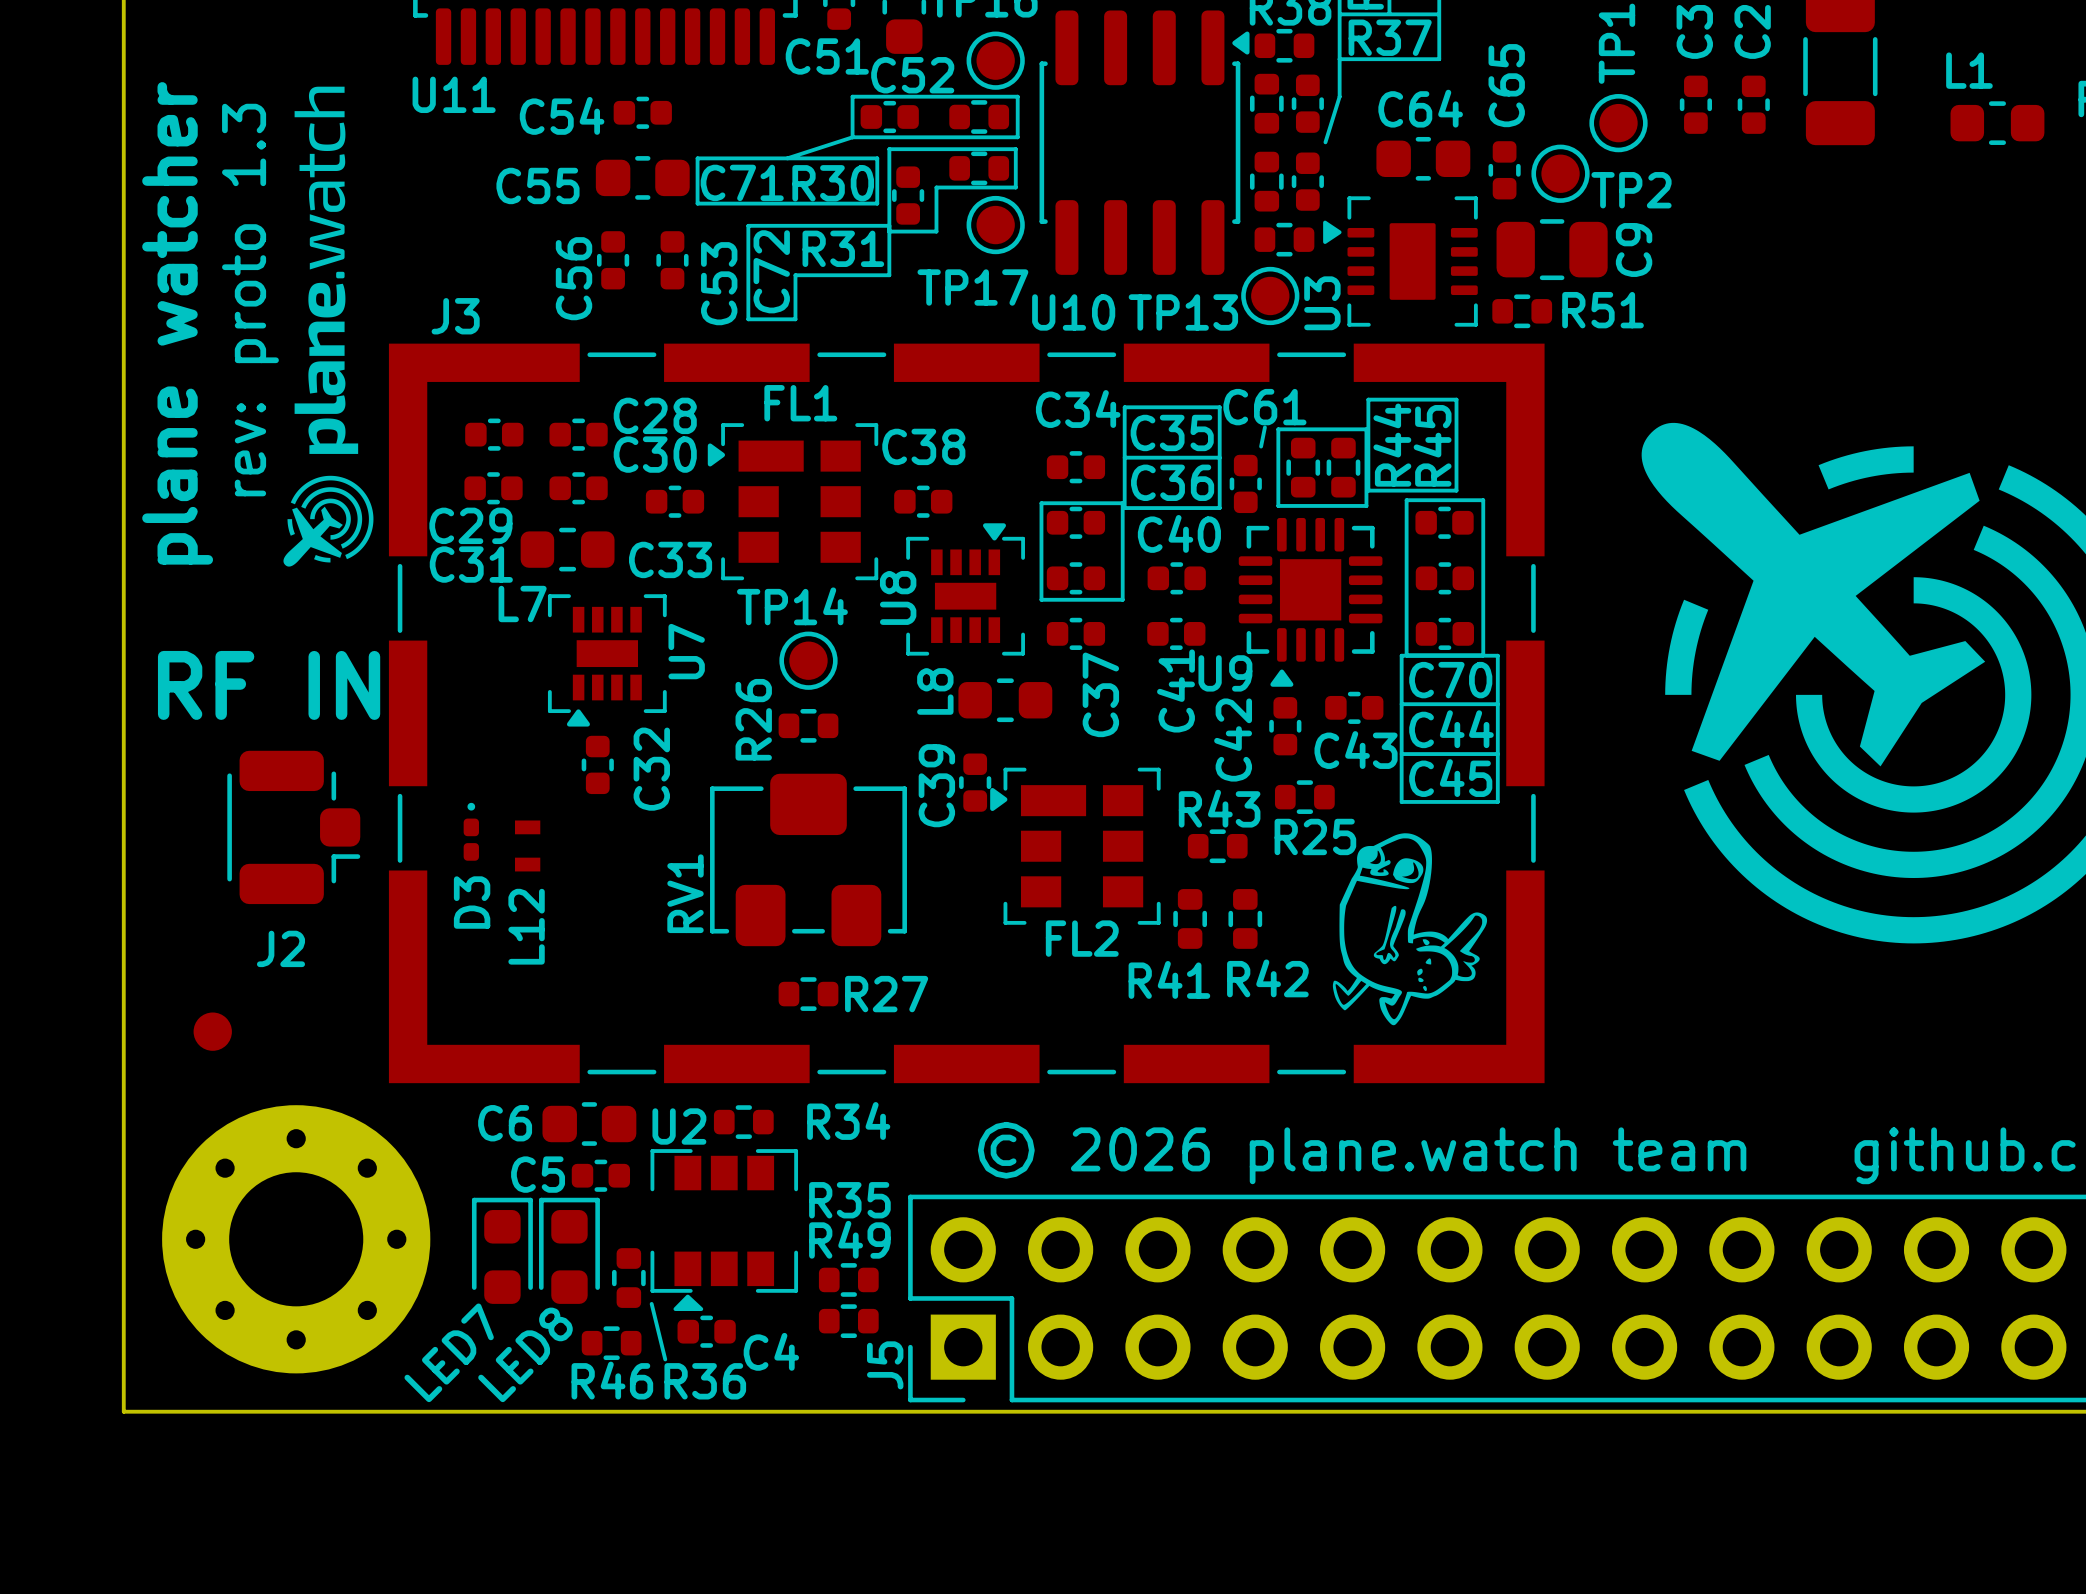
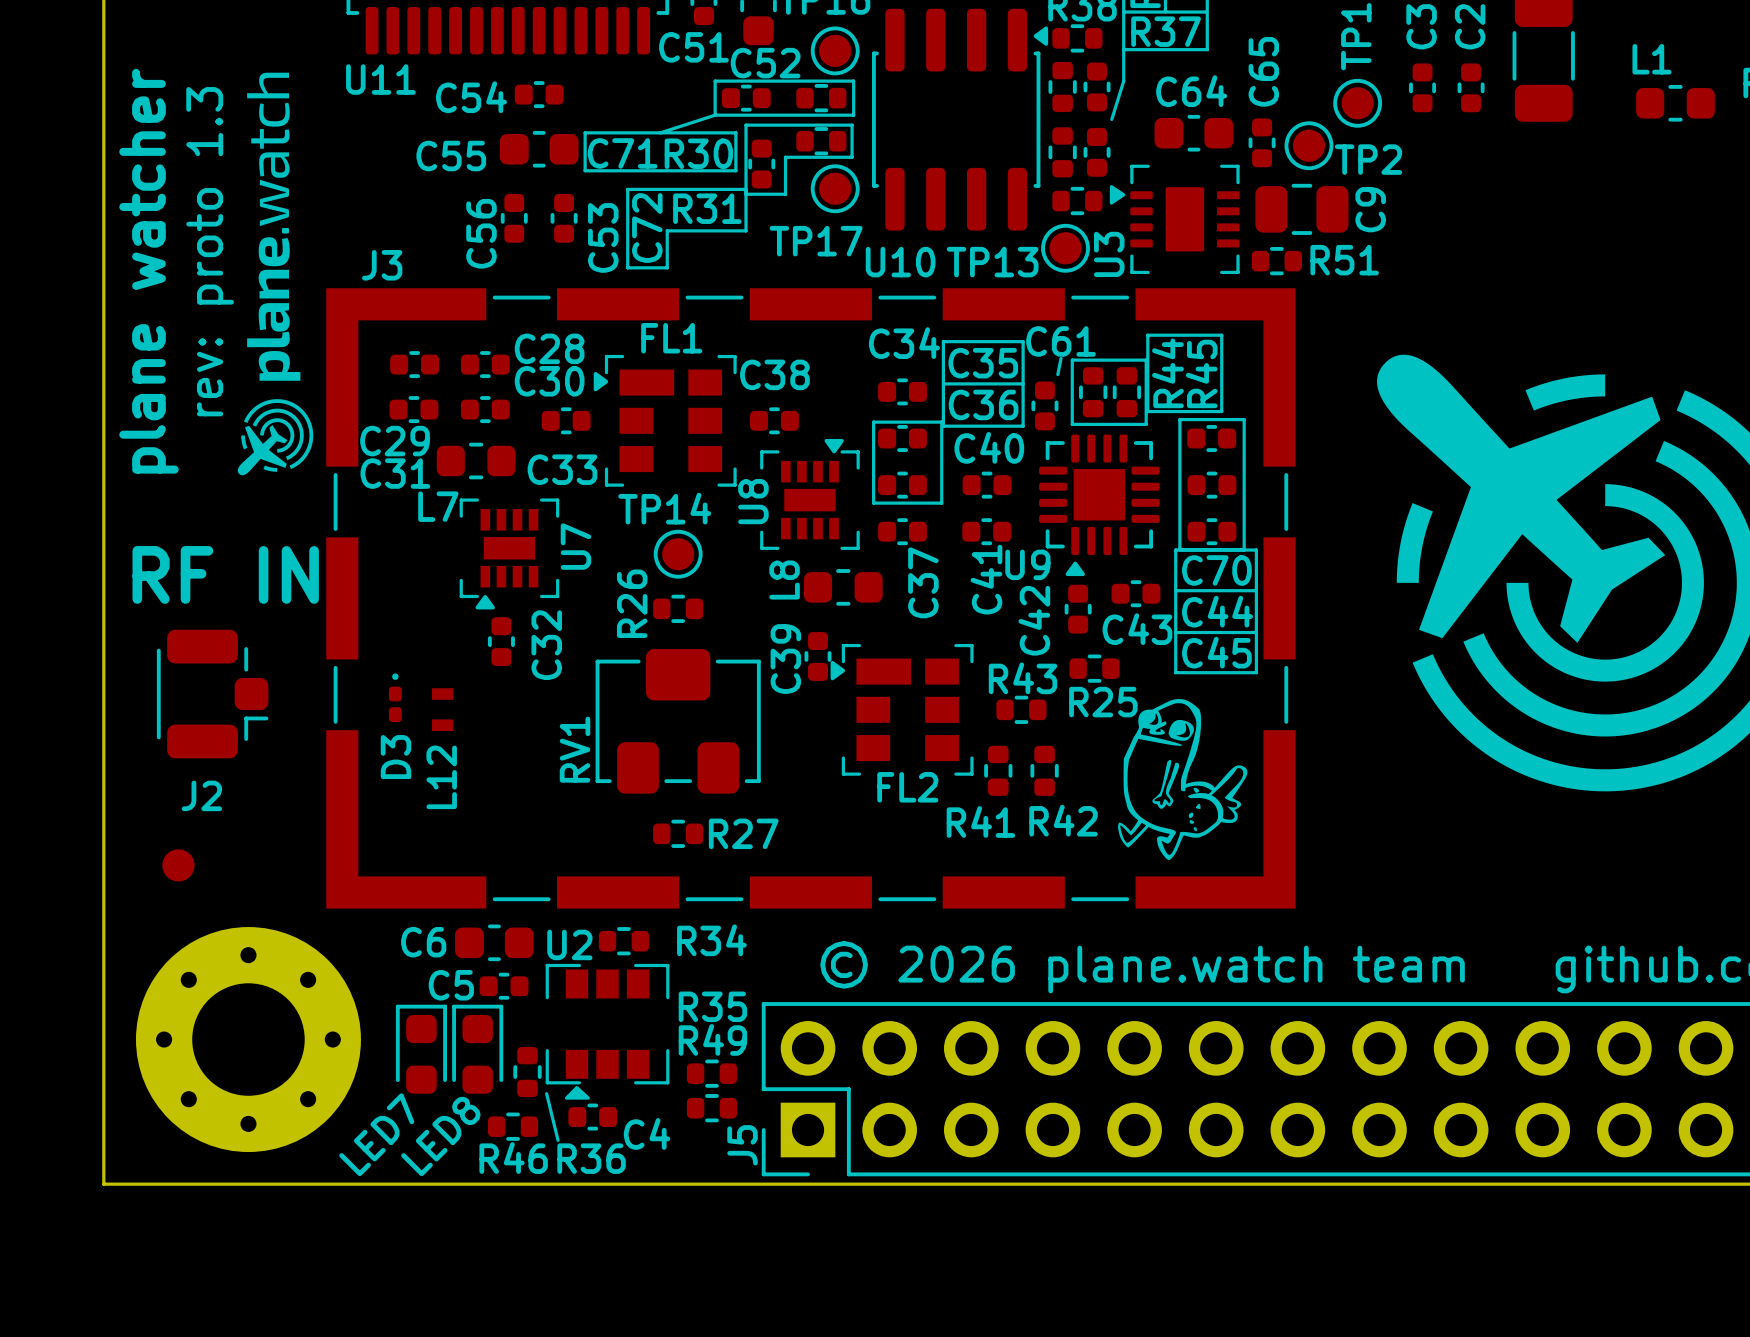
J2 position: (293, 827) -> (212, 694)

